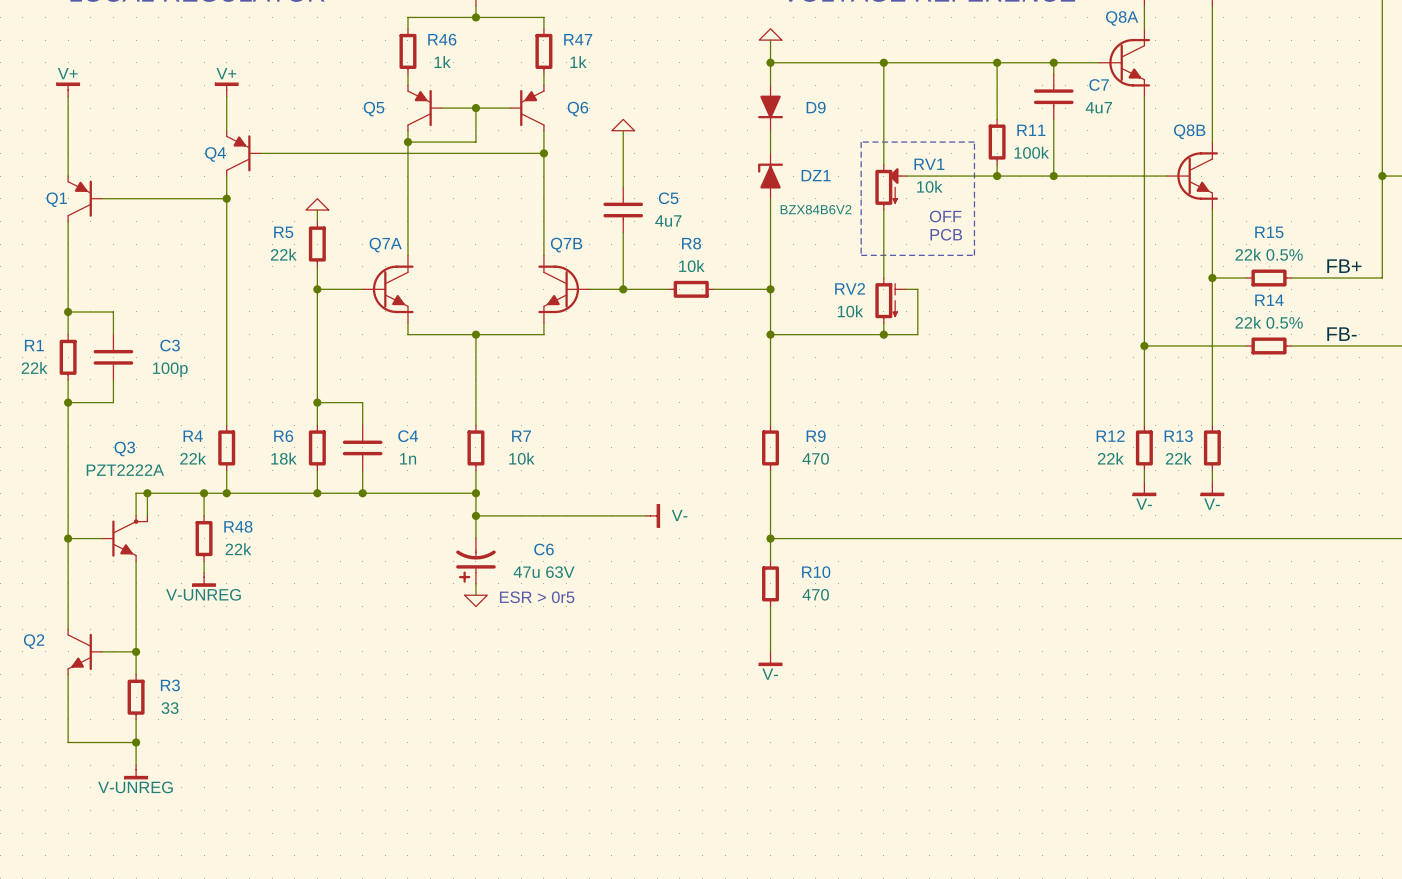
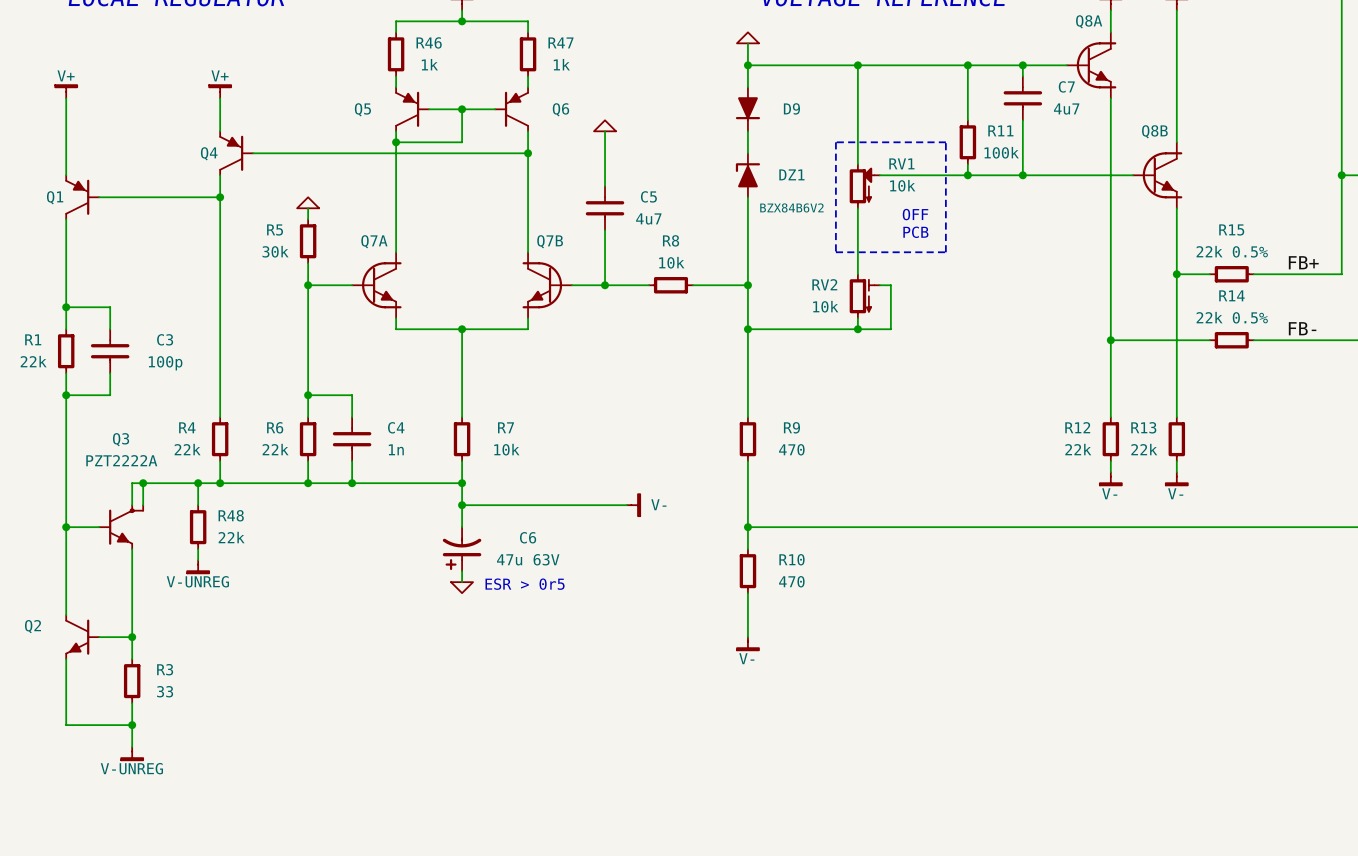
R5 value: 22k (283, 254) -> 30k (275, 251)
R6 value: 18k (284, 458) -> 22k (275, 449)

